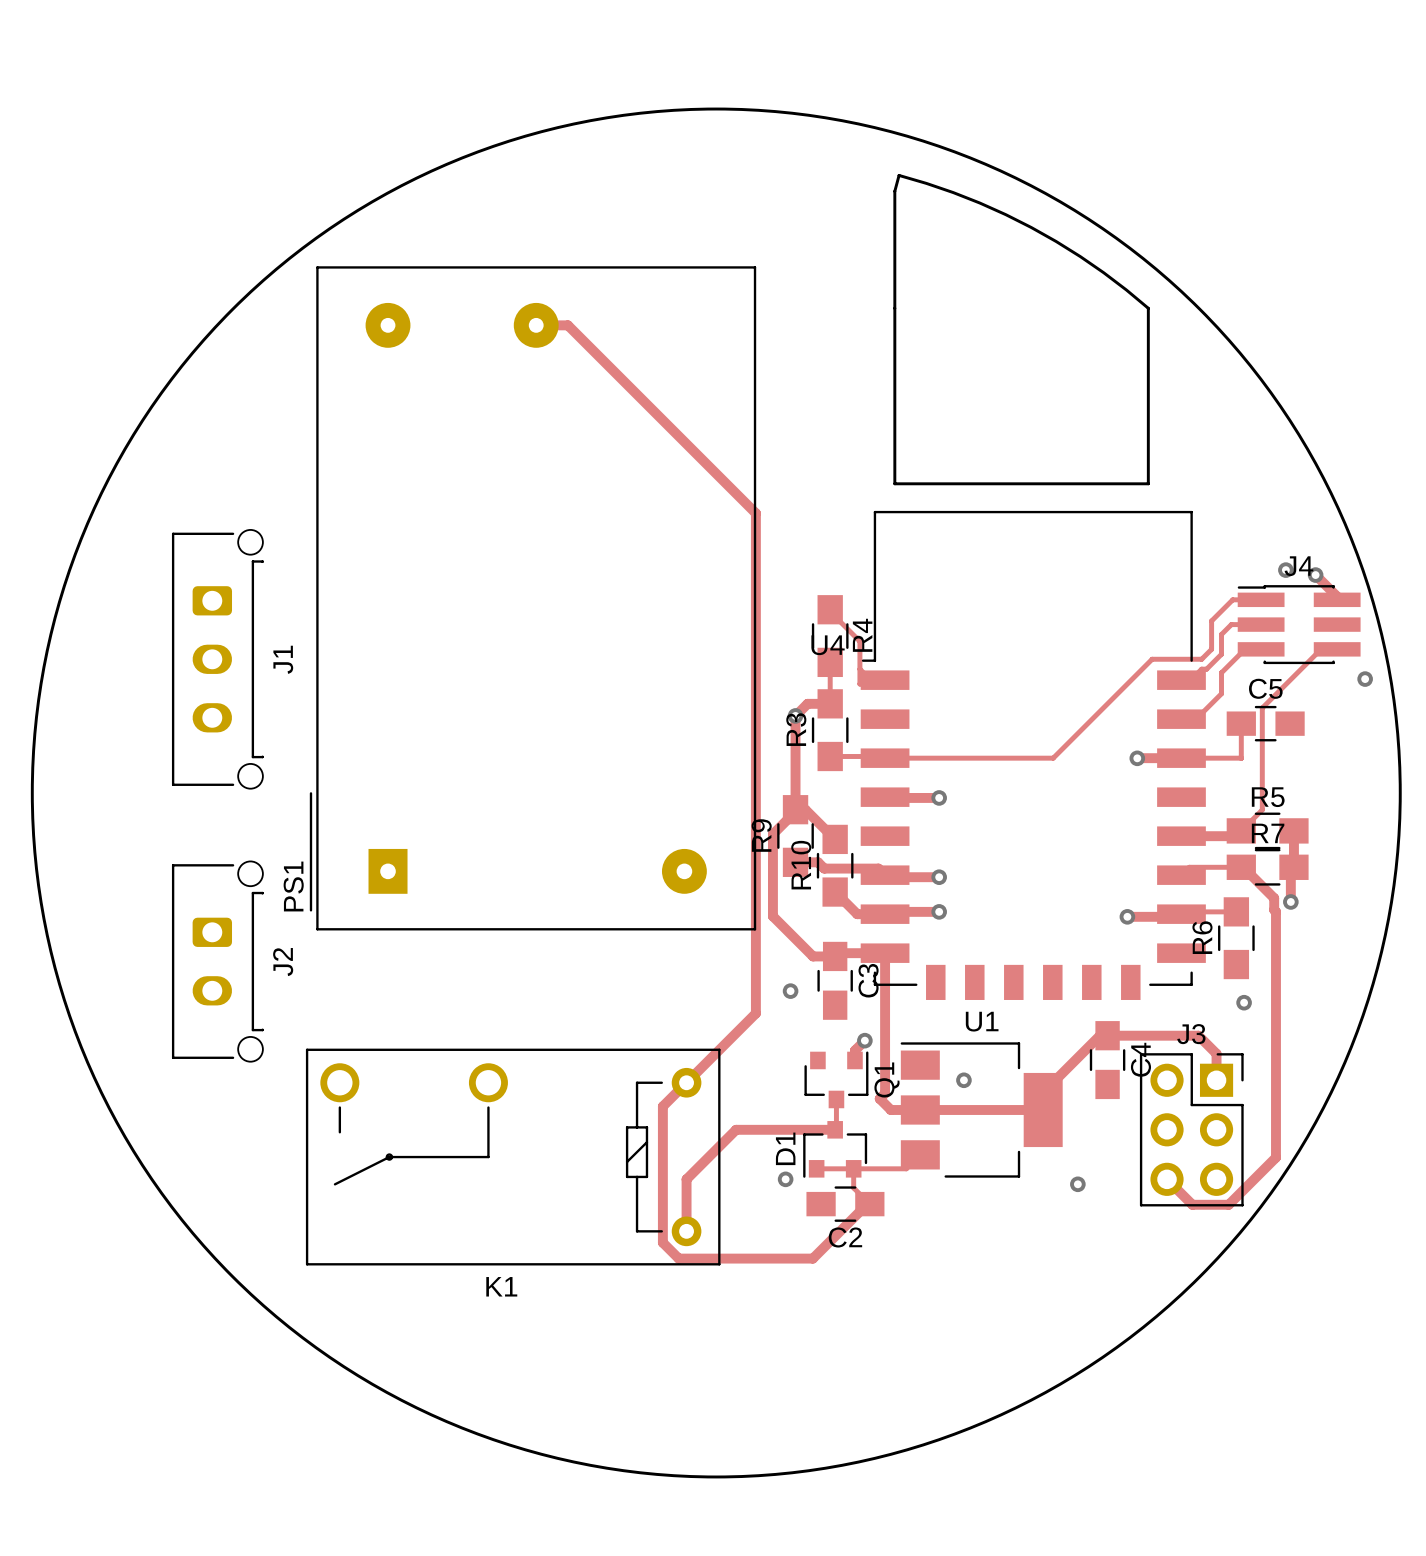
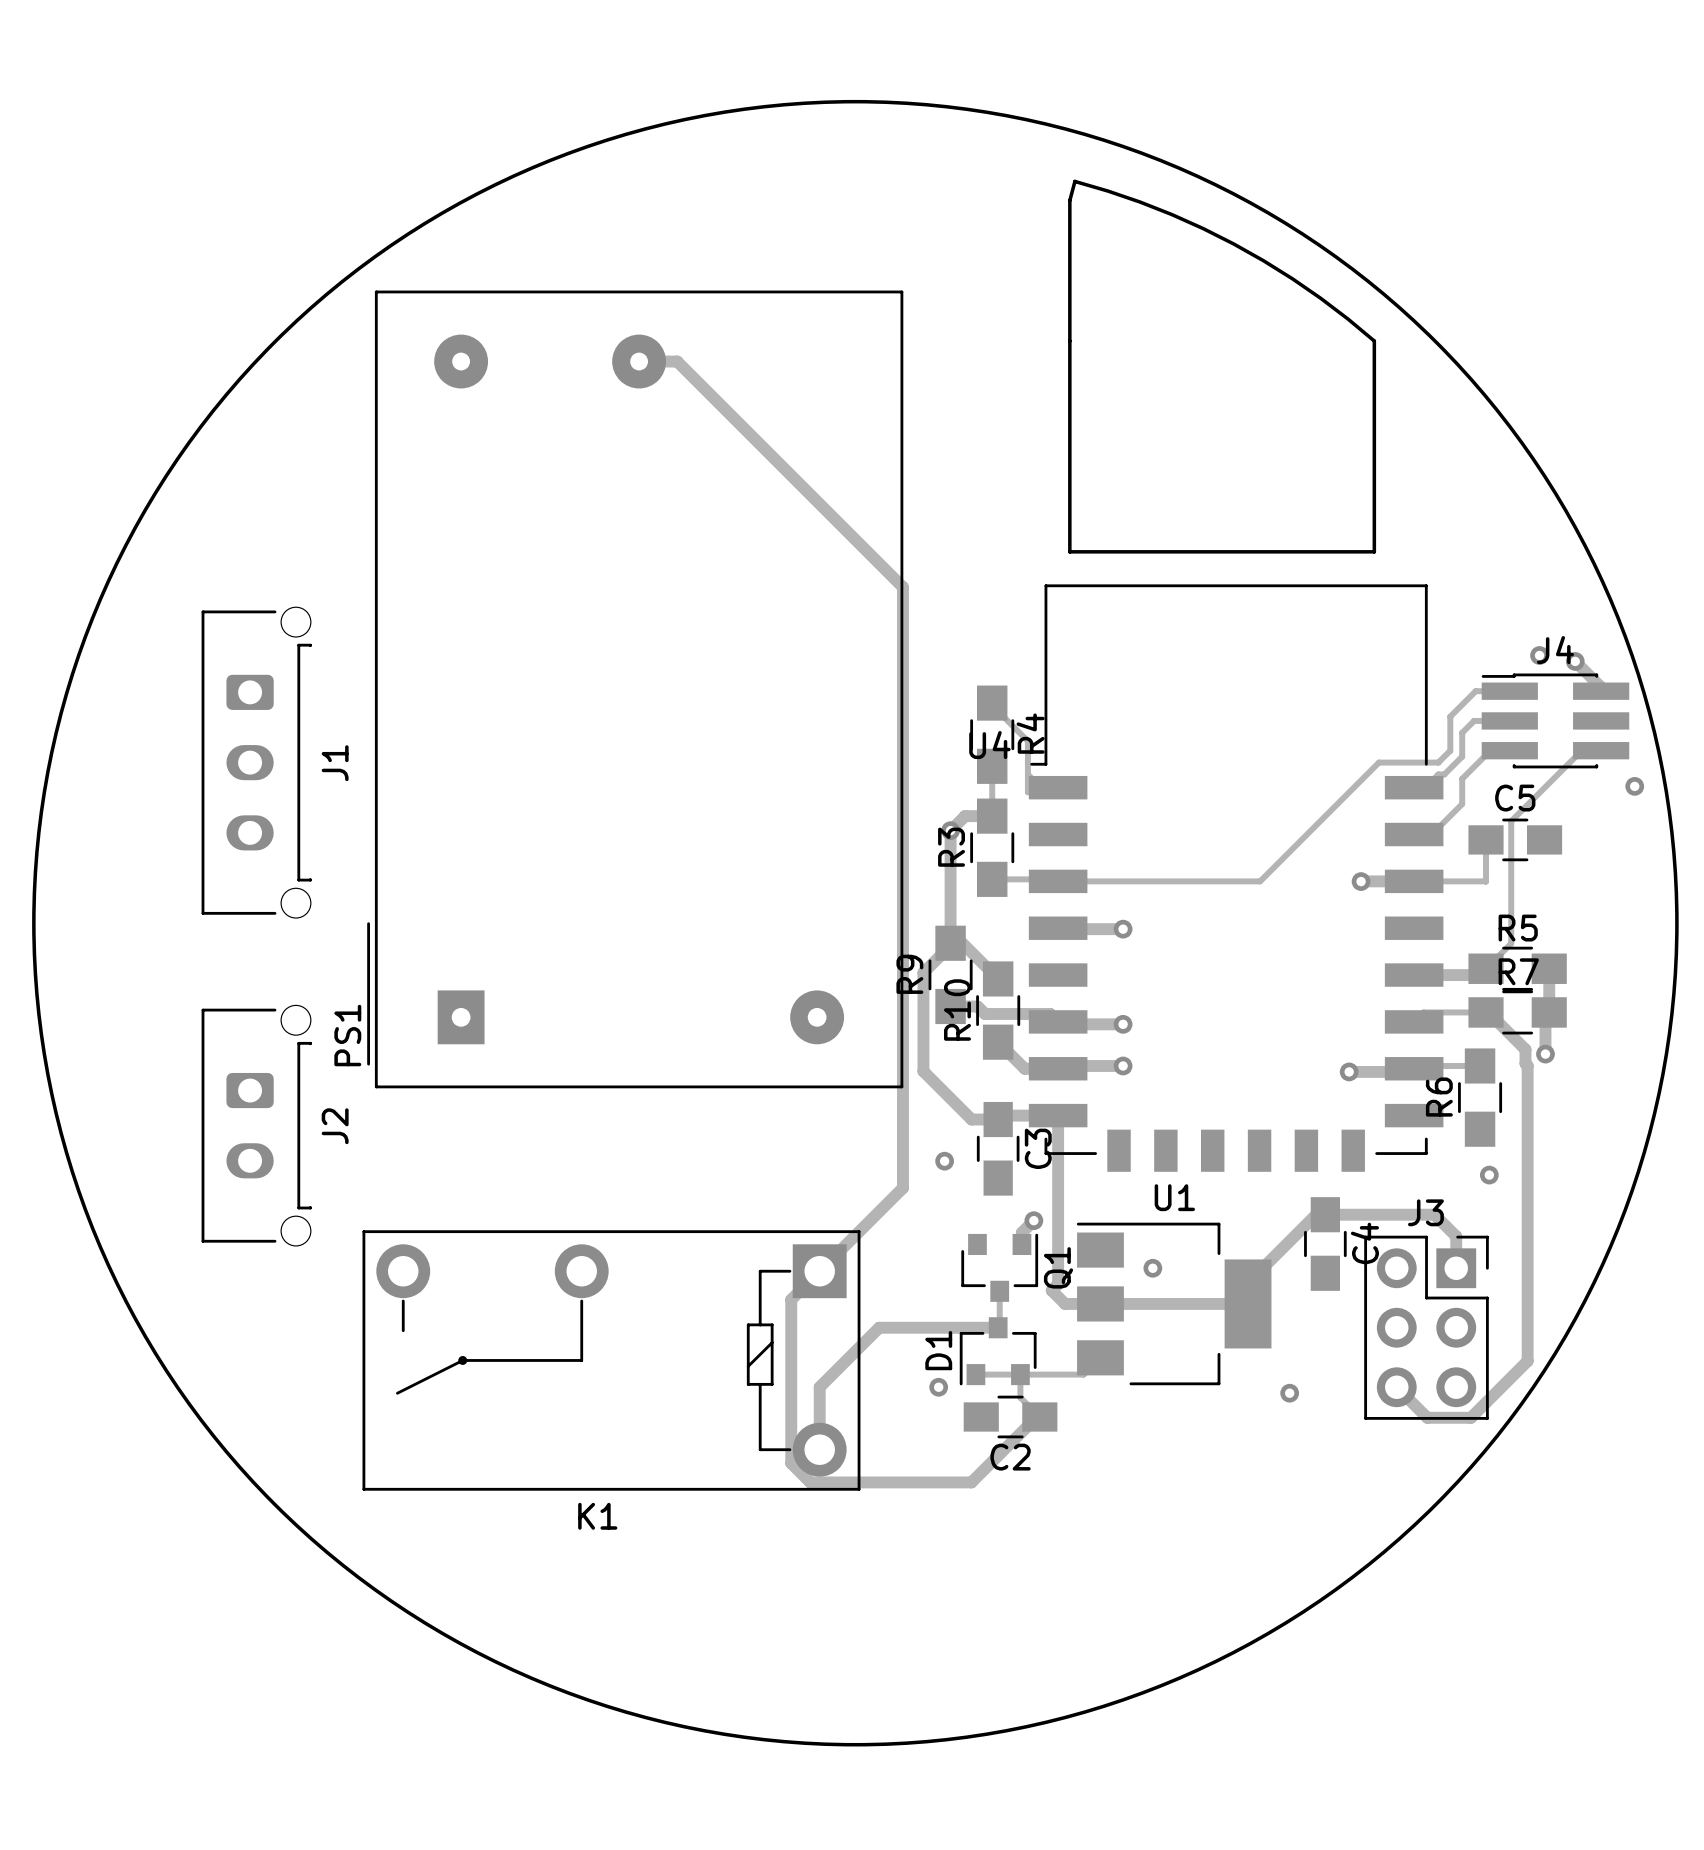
K1 footprint: [305, 1048, 721, 1266] -> [362, 1230, 861, 1491]

